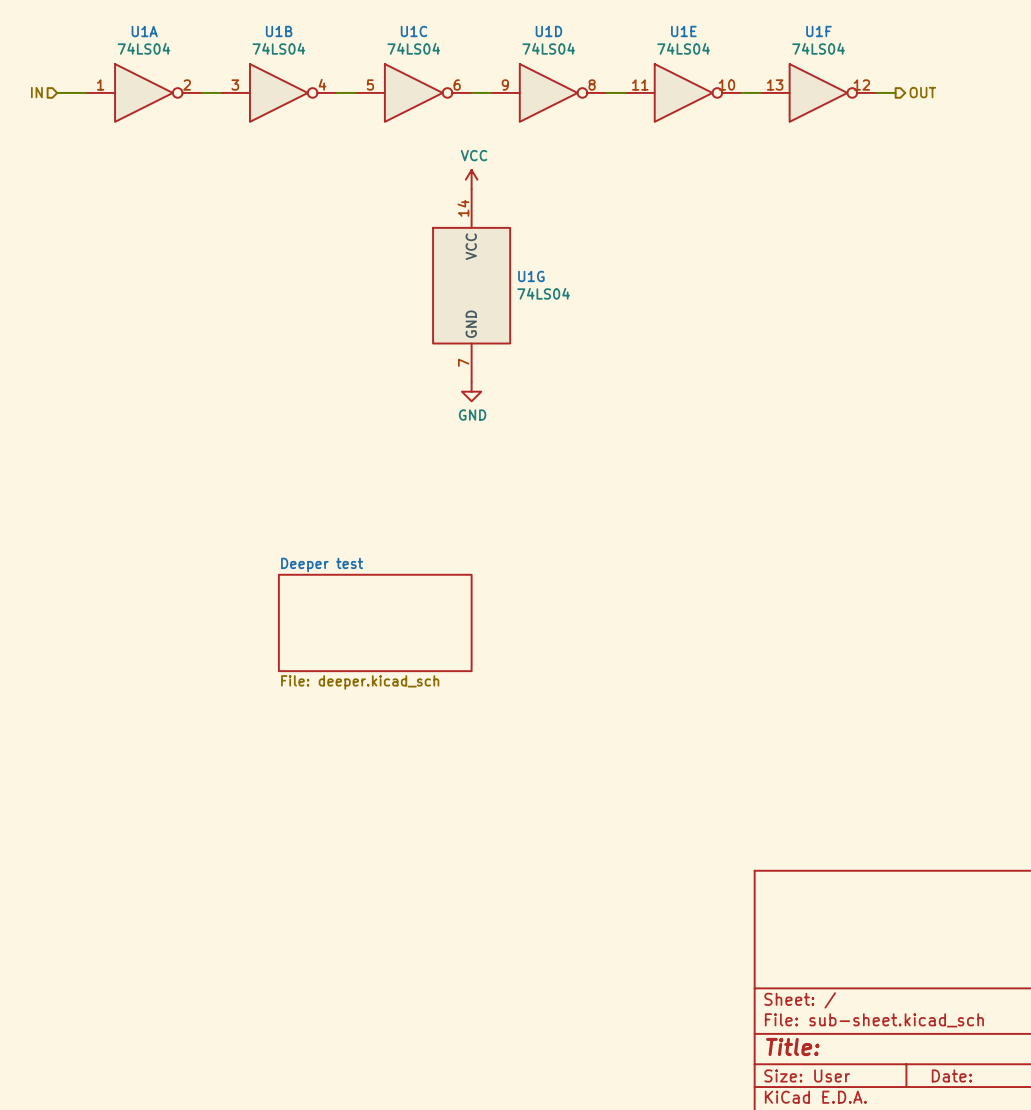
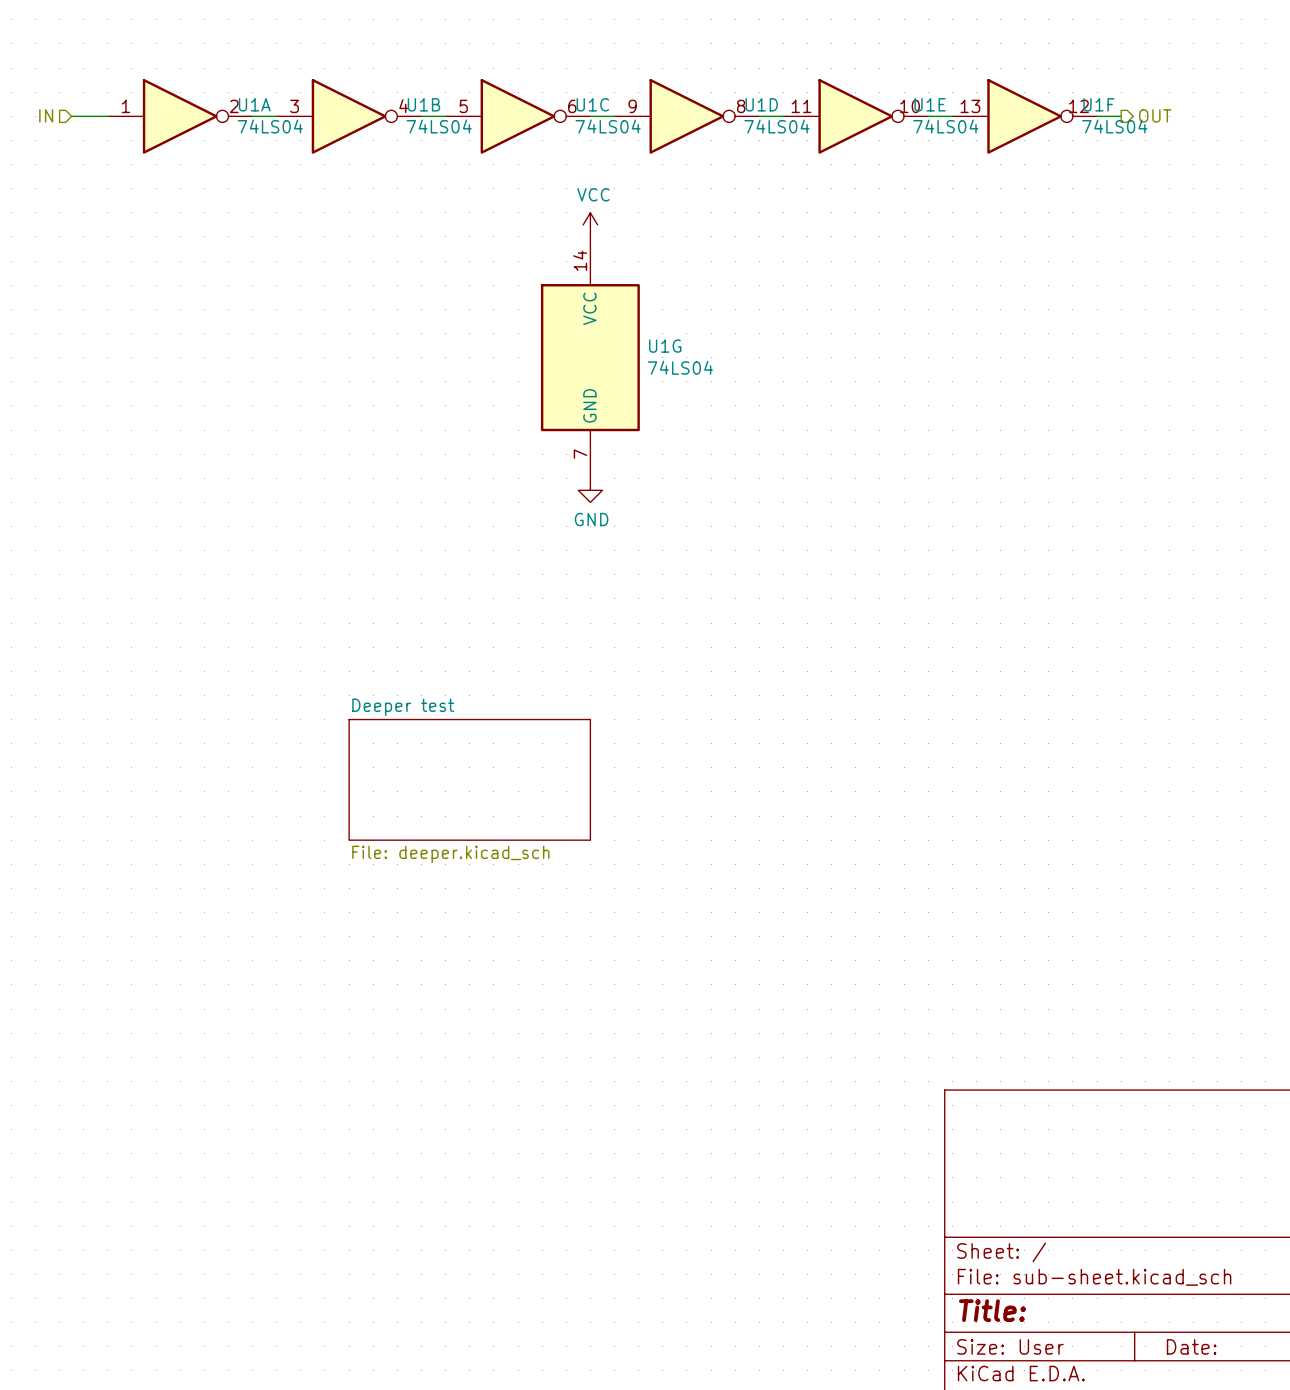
U1A name position: U1A (144, 31) -> U1A (254, 104)
U1B name position: U1B (279, 31) -> U1B (423, 104)
U1C name position: U1C (414, 31) -> U1C (592, 104)
U1D name position: U1D (548, 31) -> U1D (761, 104)
U1E name position: U1E (683, 31) -> U1E (930, 104)
U1F name position: U1F (819, 31) -> U1F (1098, 104)
U1A value position: 74LS04 (143, 48) -> 74LS04 (270, 126)
U1B value position: 74LS04 (278, 48) -> 74LS04 (439, 126)
U1C value position: 74LS04 (413, 48) -> 74LS04 (608, 126)
U1D value position: 74LS04 (548, 48) -> 74LS04 (776, 126)
U1E value position: 74LS04 (683, 48) -> 74LS04 (945, 126)
U1F value position: 74LS04 (818, 48) -> 74LS04 (1114, 126)

